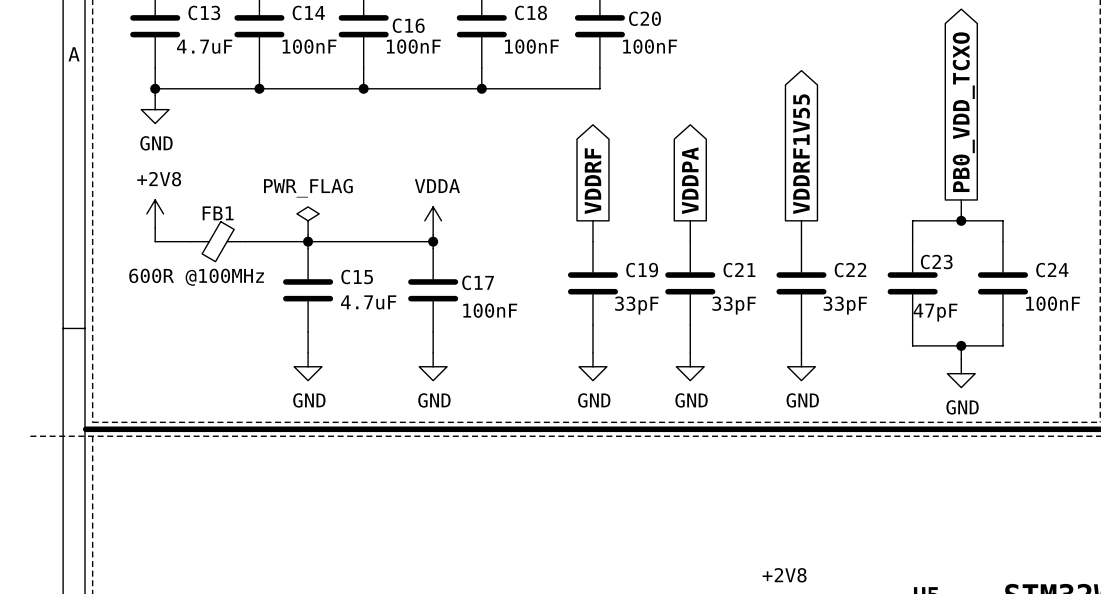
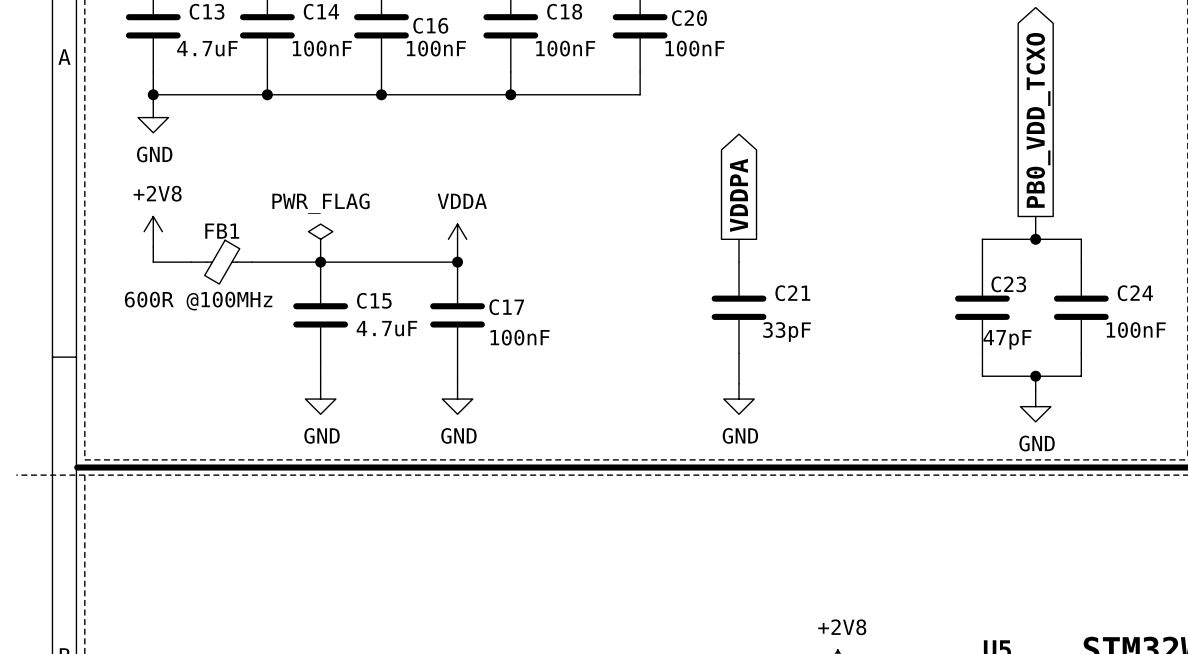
global label: VDDRF1V55 (801, 154) -> none
global label: VDDRF (592, 181) -> none
wire: (592, 220) (592, 241) -> none
wire: (801, 220) (801, 241) -> none
C19: 33pF (592, 283) -> none
C22: 33pF (801, 283) -> none
wire: (592, 325) (592, 352) -> none
wire: (801, 325) (801, 352) -> none
power symbol: GND (592, 366) -> none
power symbol: GND (801, 366) -> none

